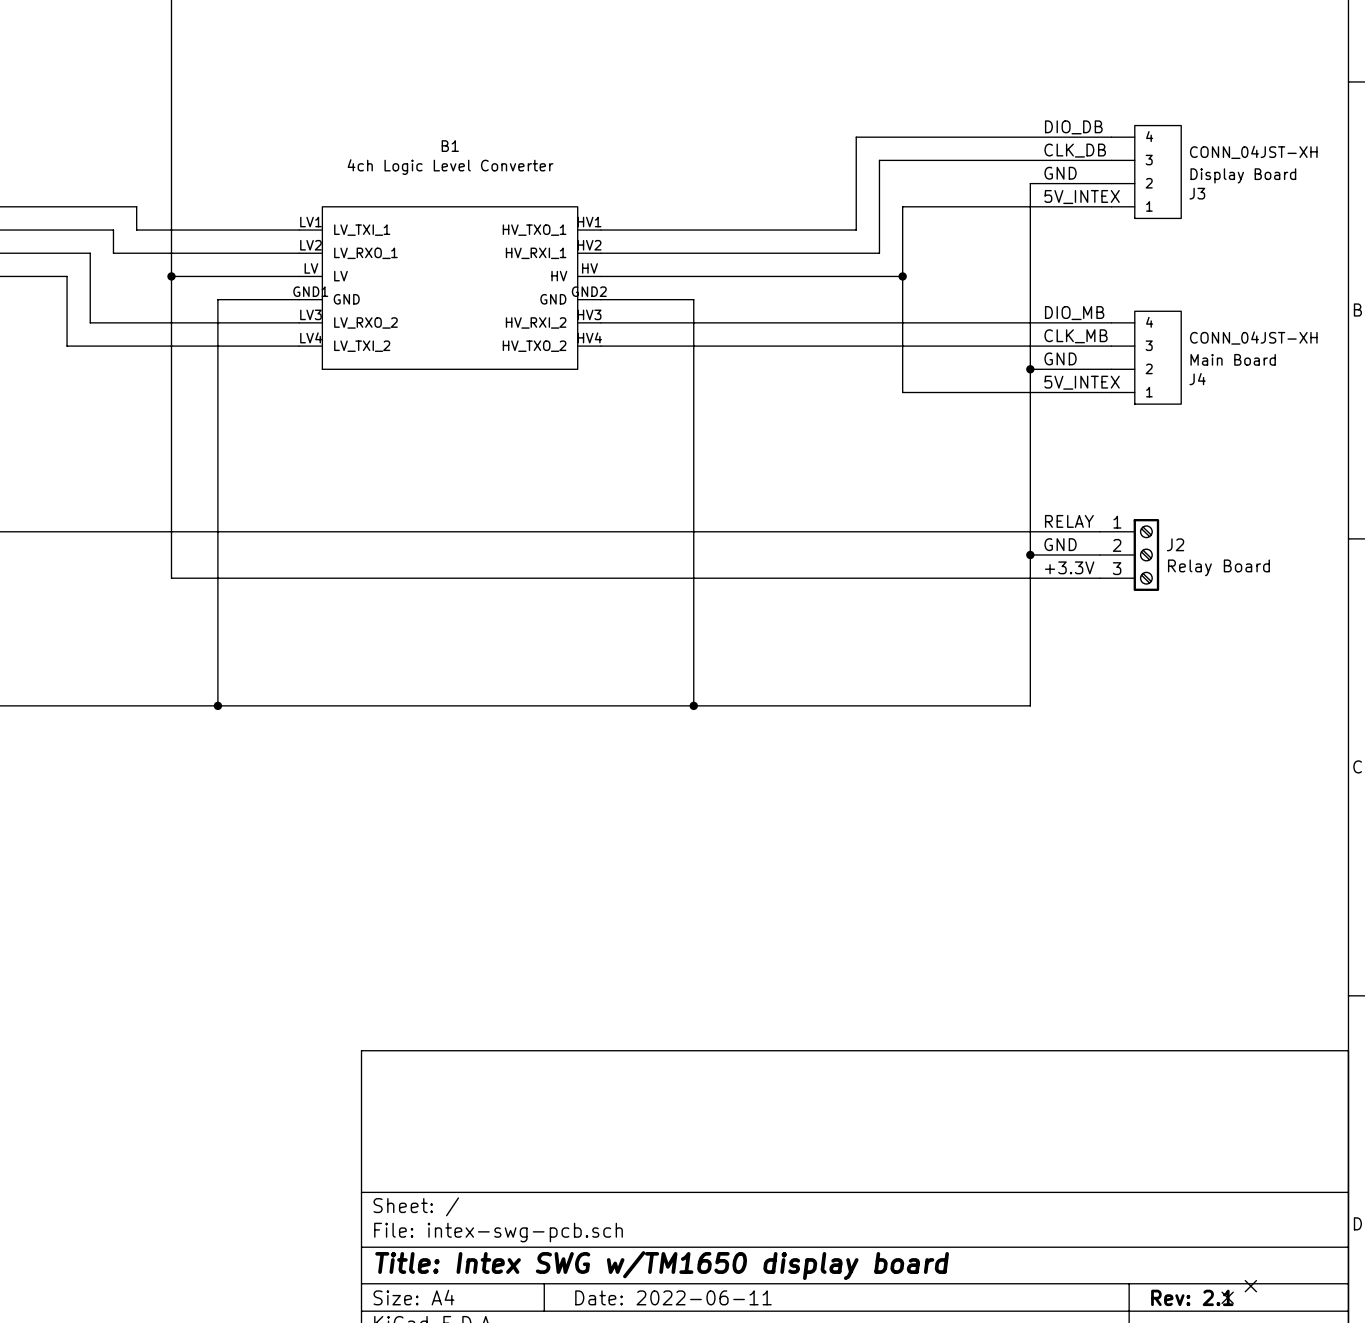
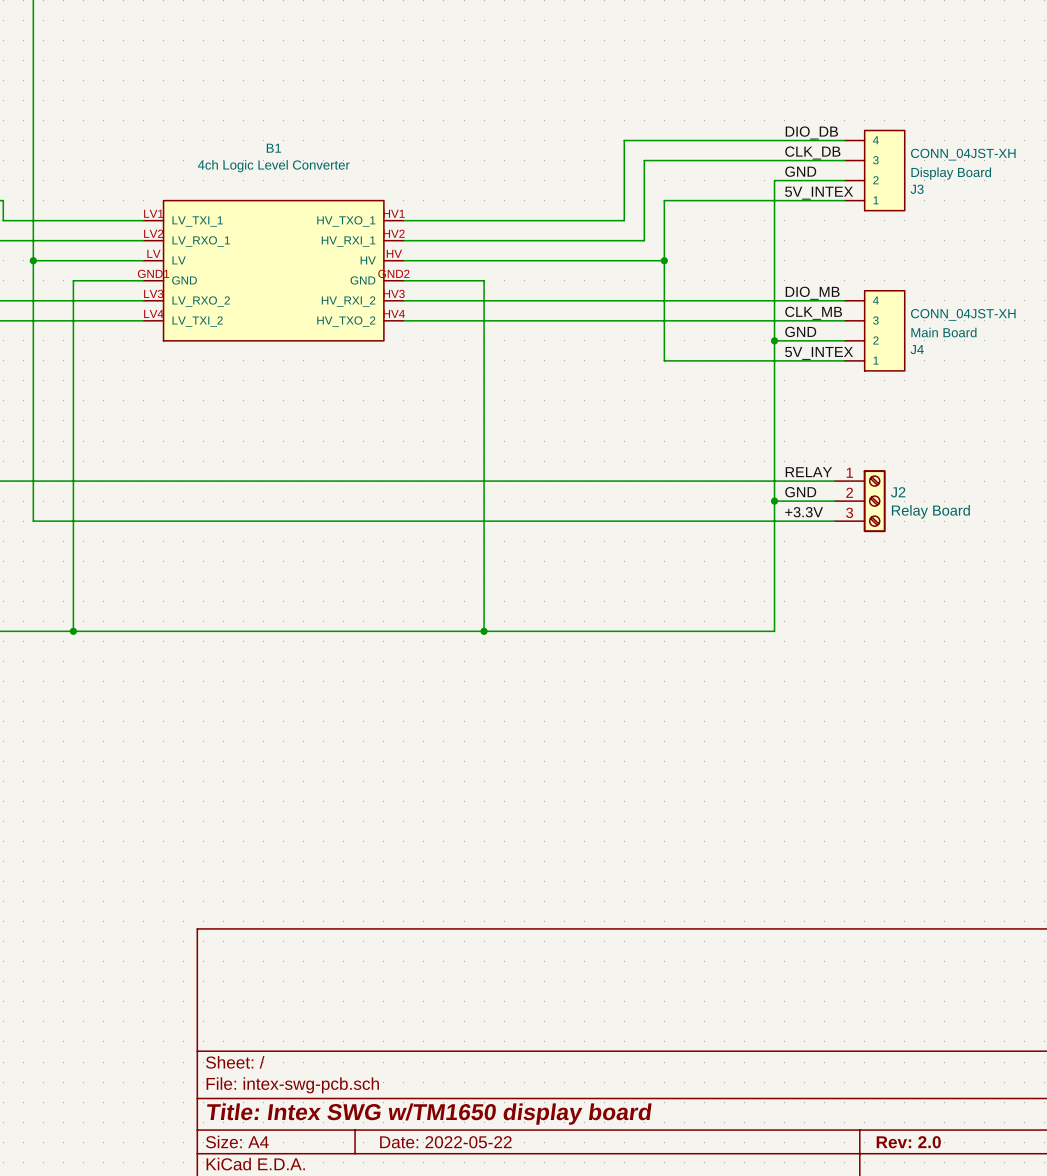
no-connect mark: (1250, 1286) -> none
title block: Date: 2022-06-11 (673, 1297) -> Date: 2022-05-22 (445, 1142)
title block: Rev: 2.1 (1192, 1297) -> Rev: 2.0 (908, 1142)
no-connect mark: (1227, 1297) -> none

